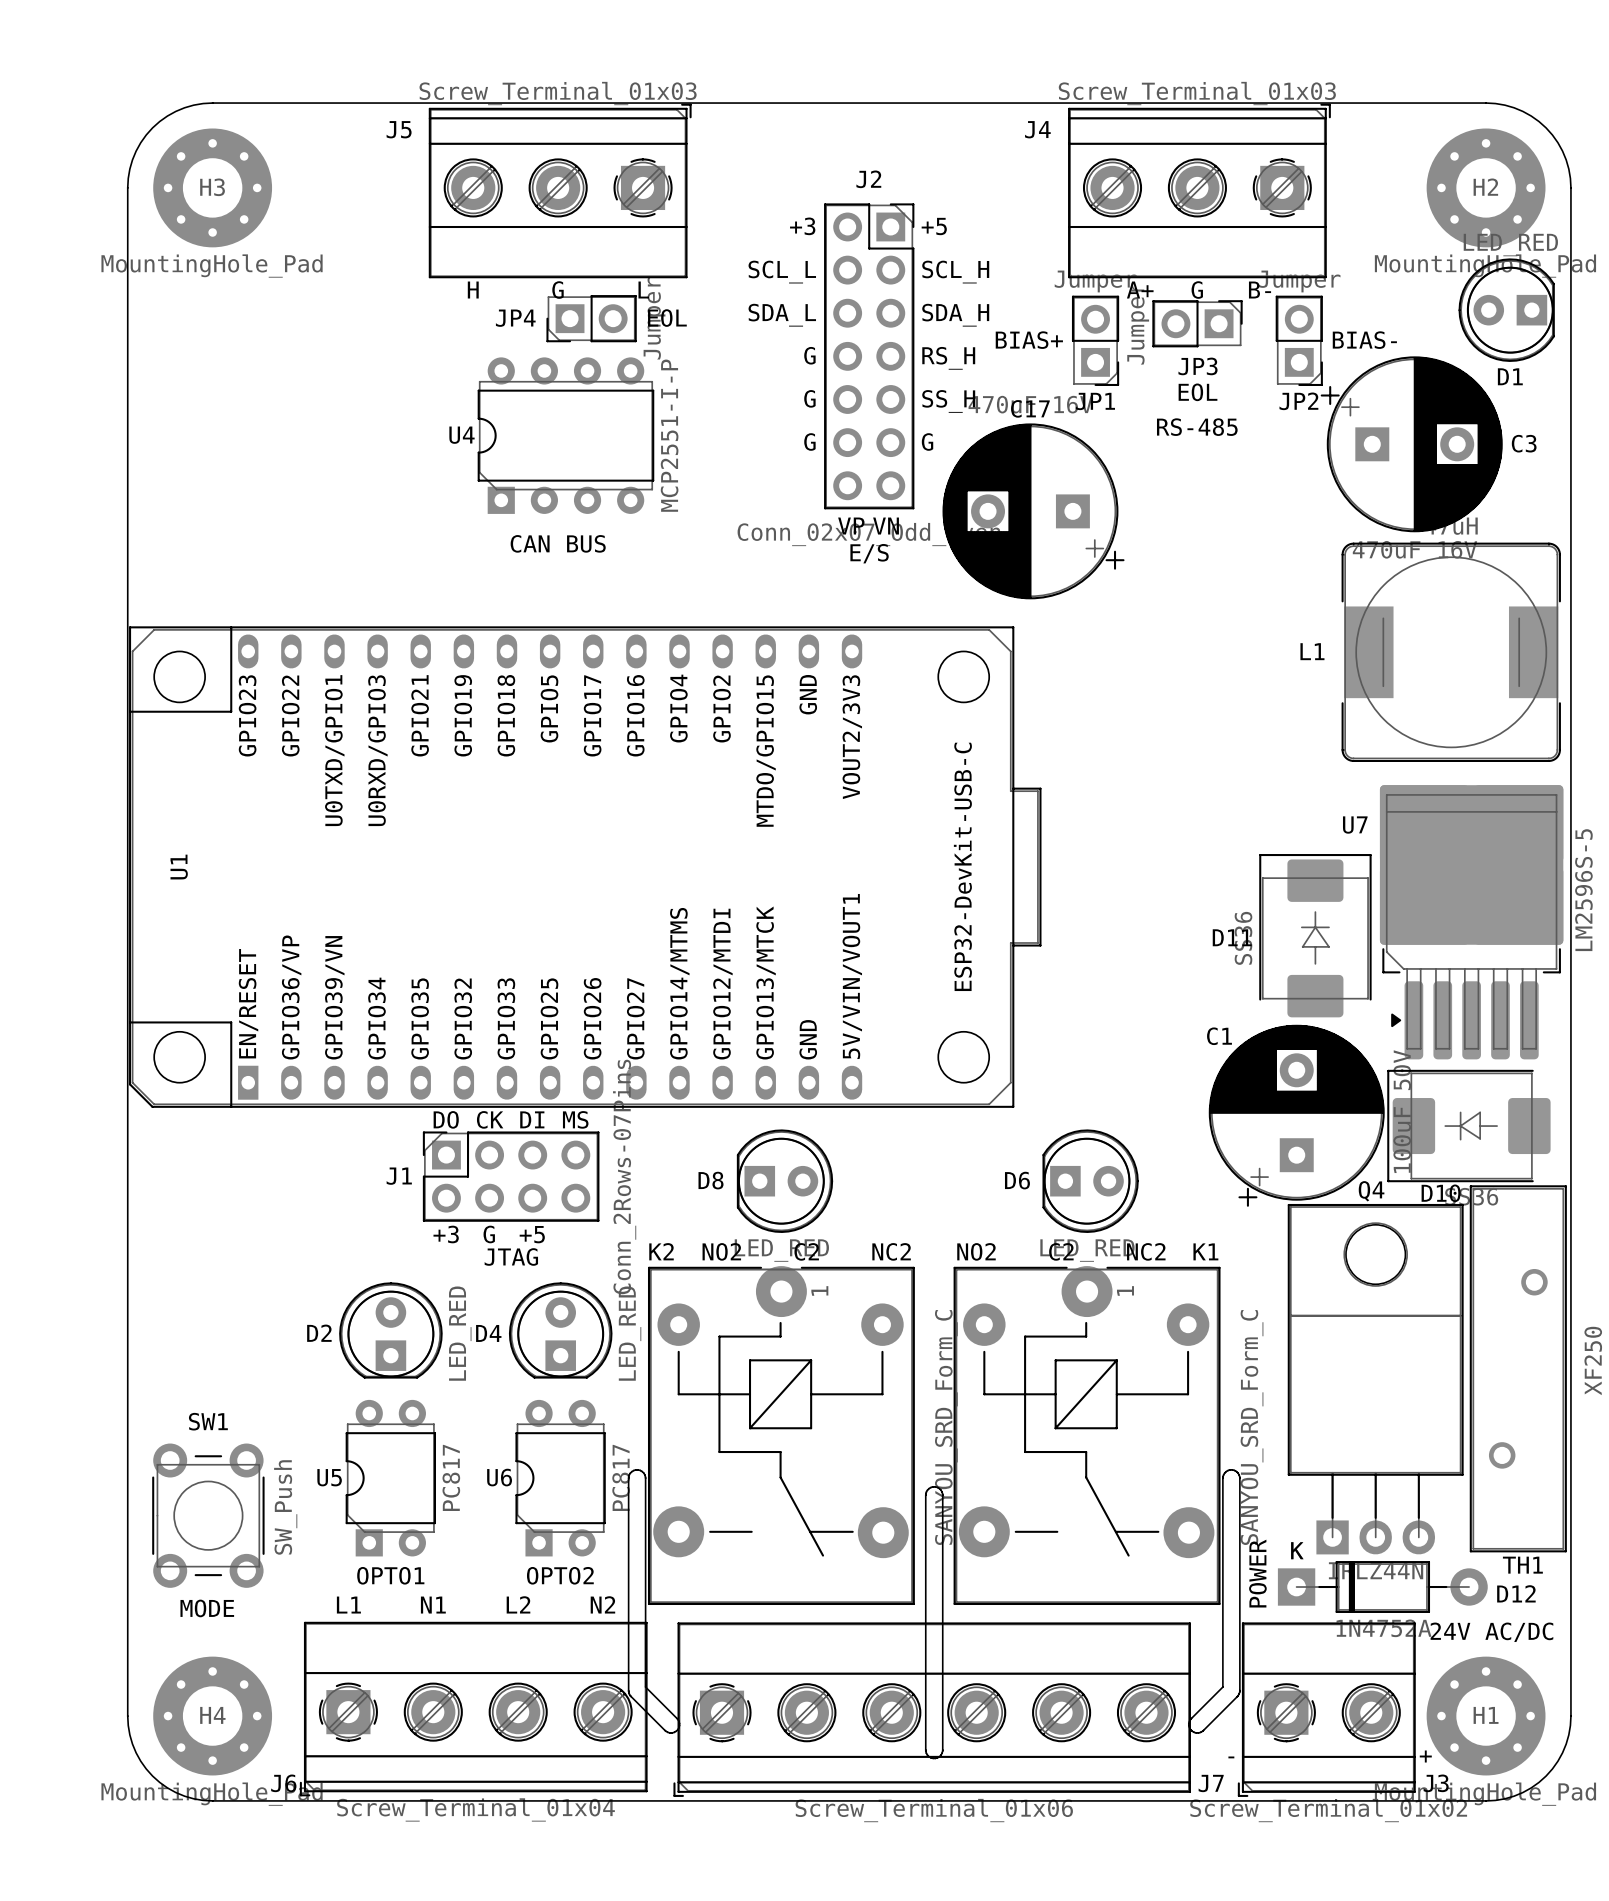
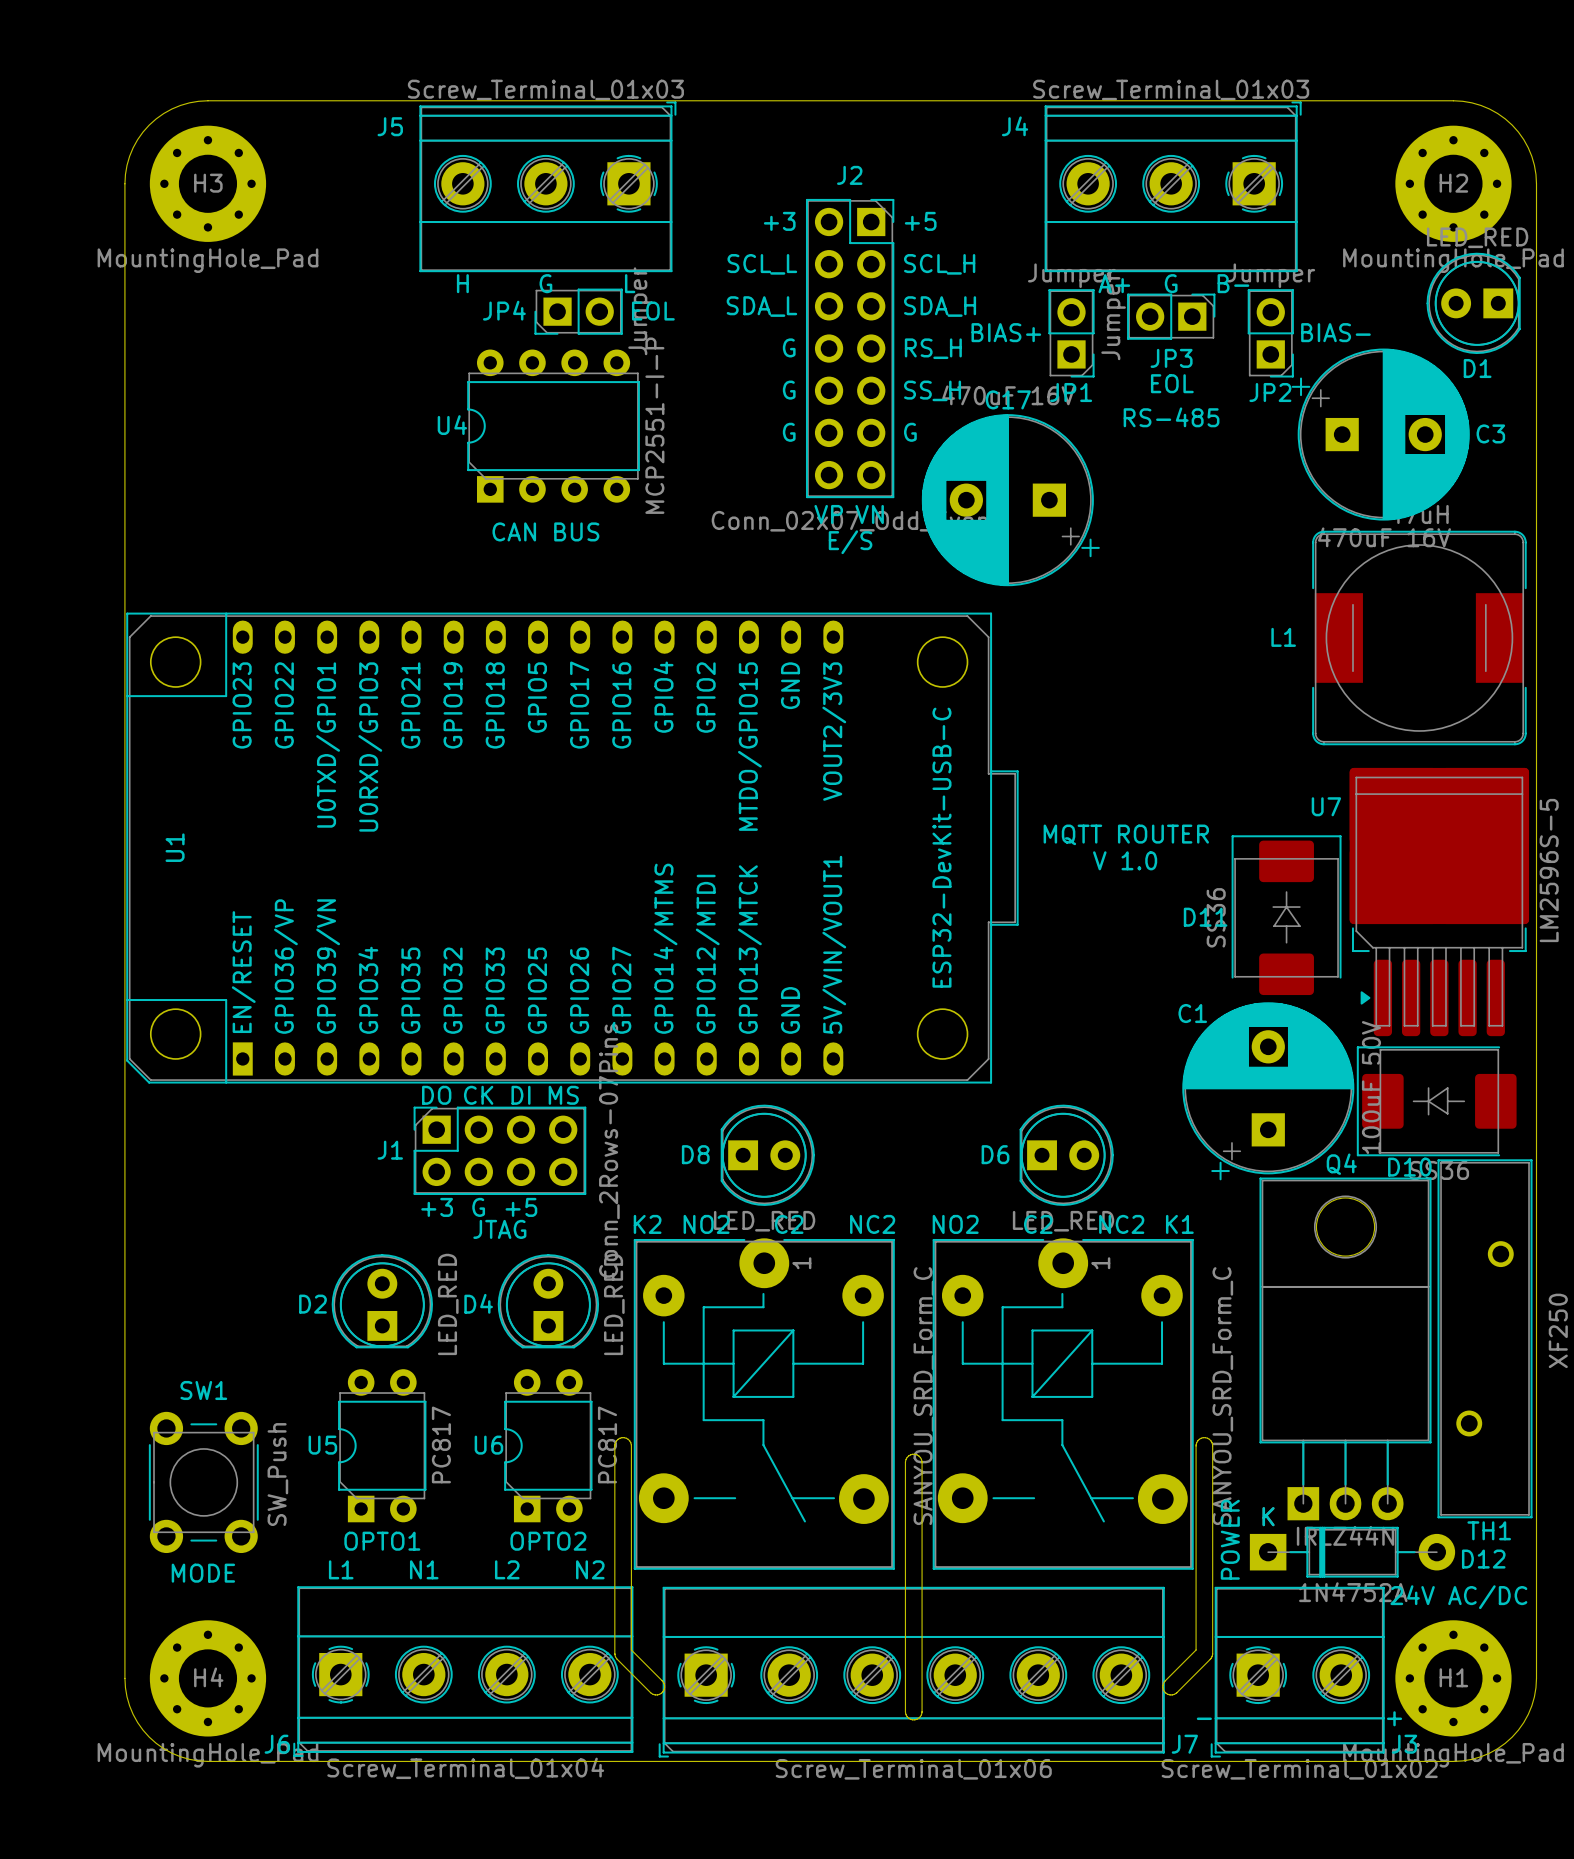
text: none -> MQTT ROUTER (1126, 834)
text: none -> V 1.0 (1125, 860)

